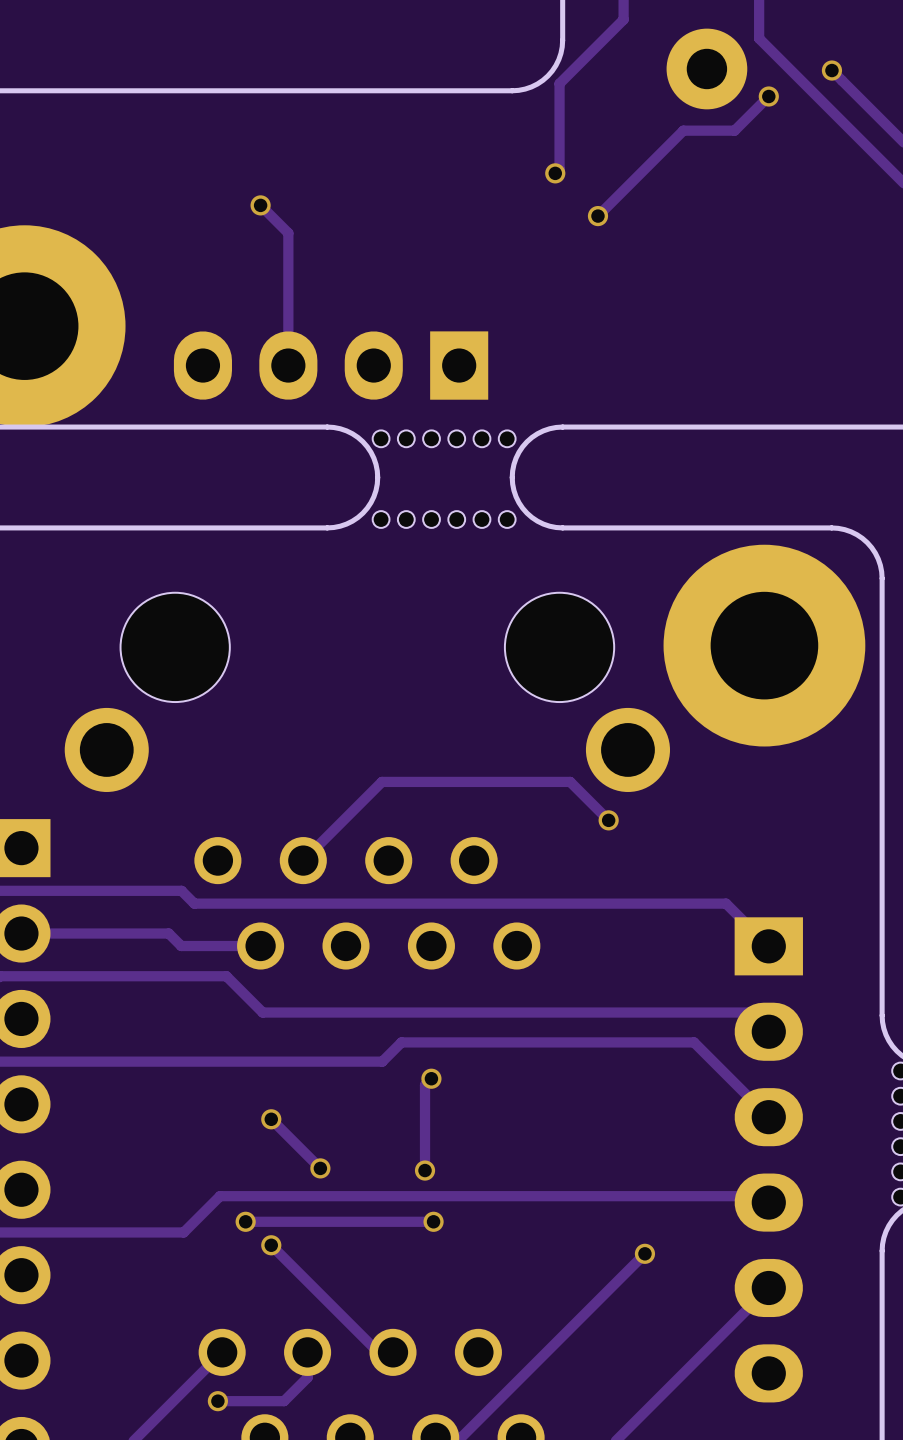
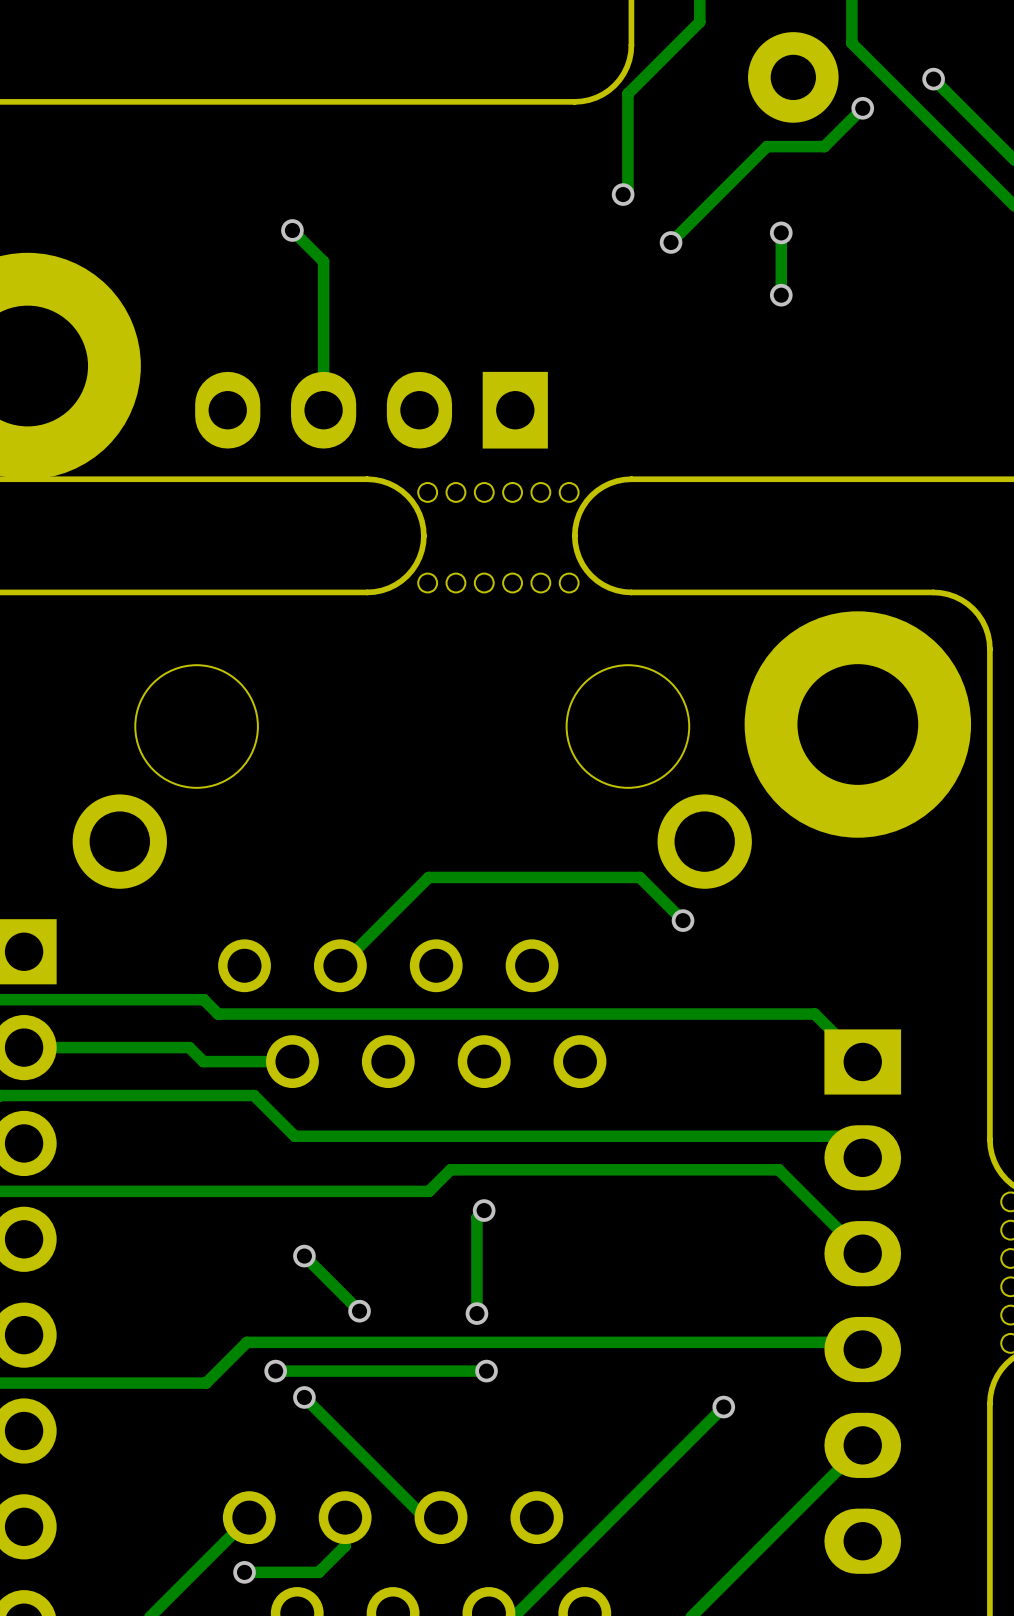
track: none -> (781, 232) (781, 295)
via: none -> (781, 232)
via: none -> (781, 295)

